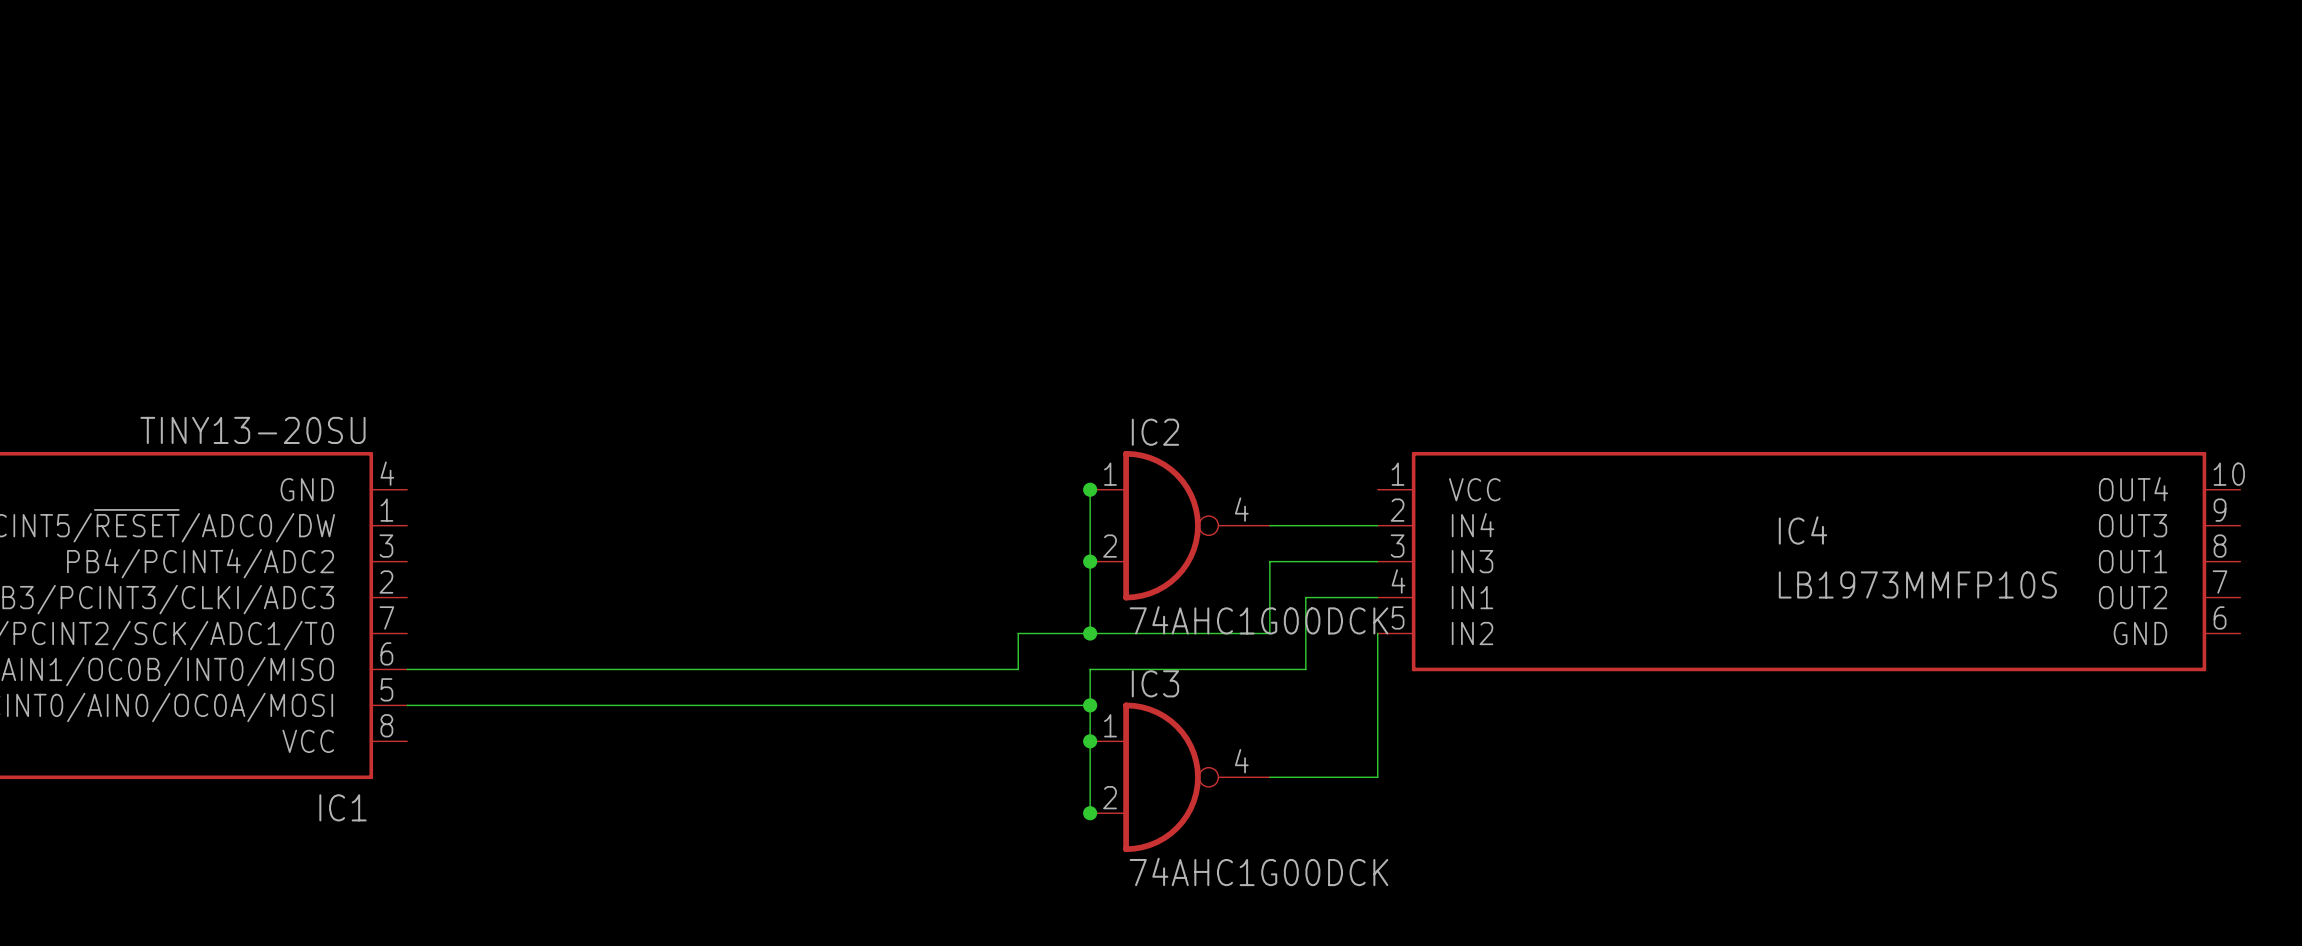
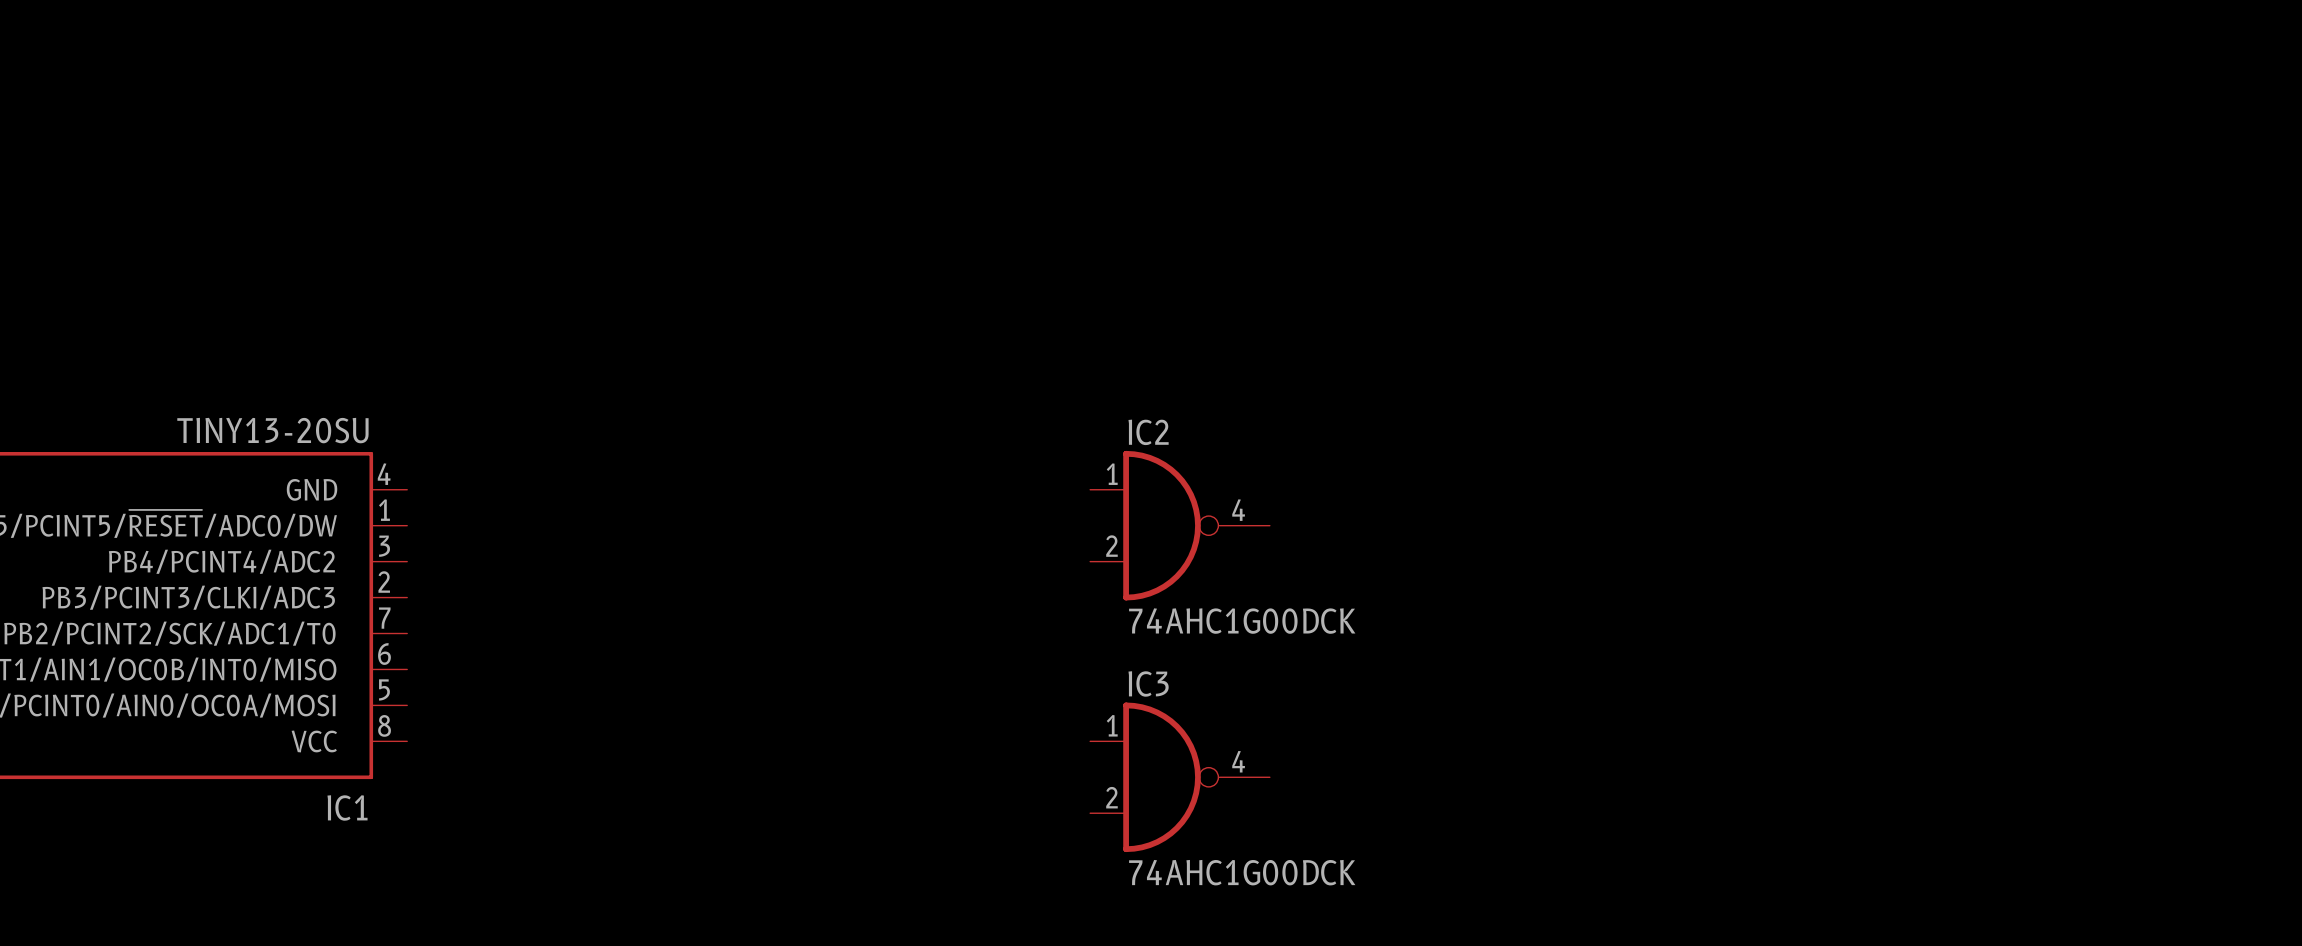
wire: (1090, 489) (1090, 633) -> none
junction: (1090, 489) -> none
wire: (1269, 525) (1377, 525) -> none
junction: (1090, 561) -> none
wire: (1377, 561) (1269, 561) (1269, 633) (1018, 633) (1018, 669) (407, 669) -> none
IC4: LB1973MMFP10S (1809, 561) -> none
wire: (1377, 597) (1305, 597) (1305, 669) (1090, 669) (1090, 813) -> none
junction: (1090, 633) -> none
wire: (1377, 633) (1377, 777) (1269, 777) -> none
wire: (407, 705) (1090, 705) -> none
junction: (1090, 705) -> none
junction: (1090, 741) -> none
junction: (1090, 813) -> none

